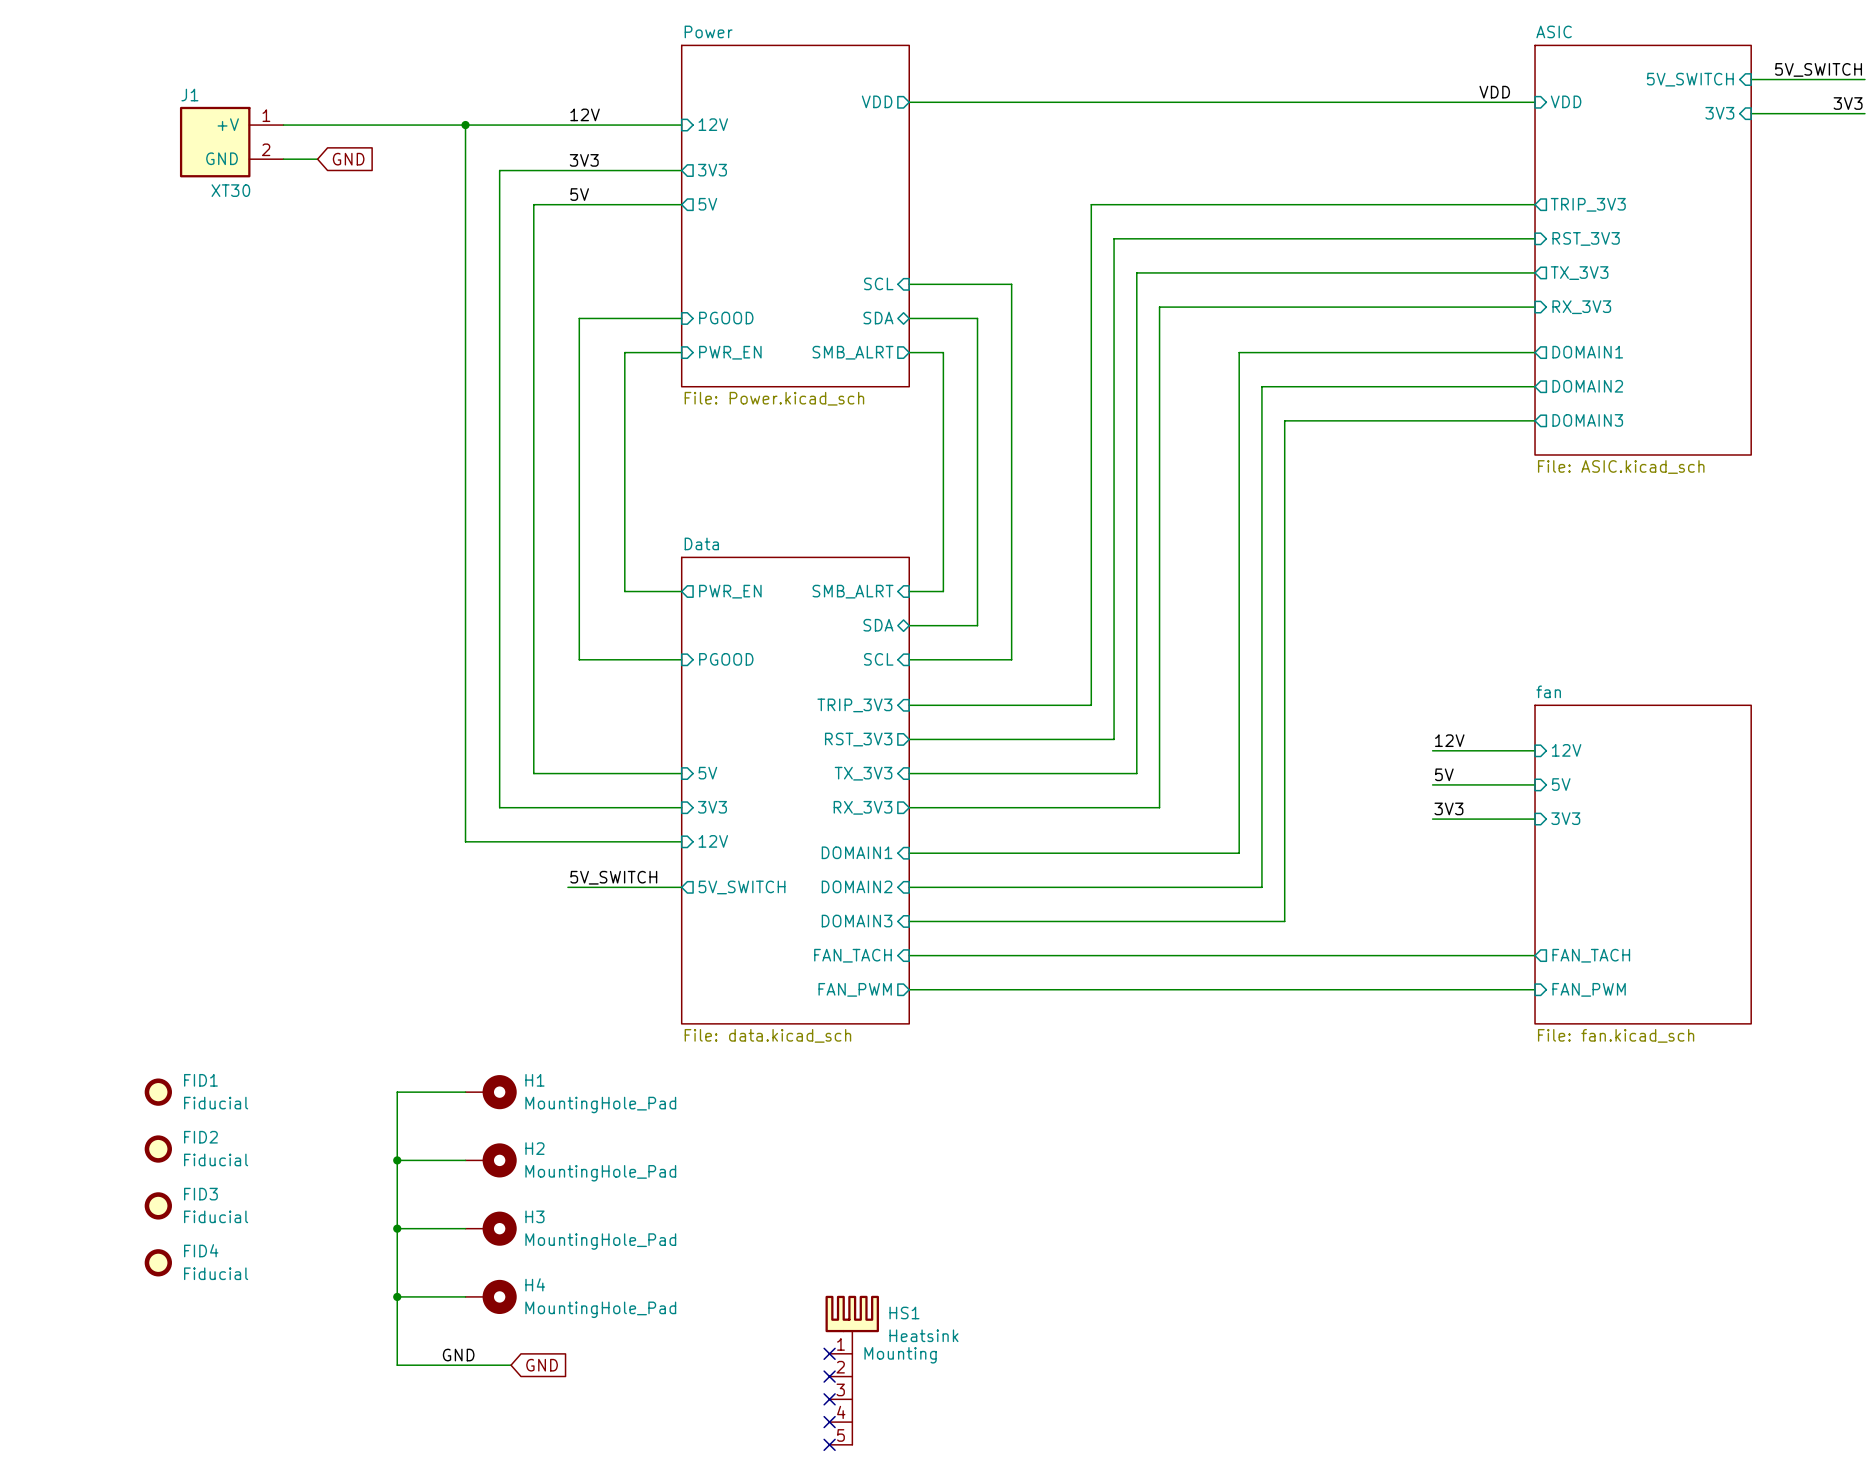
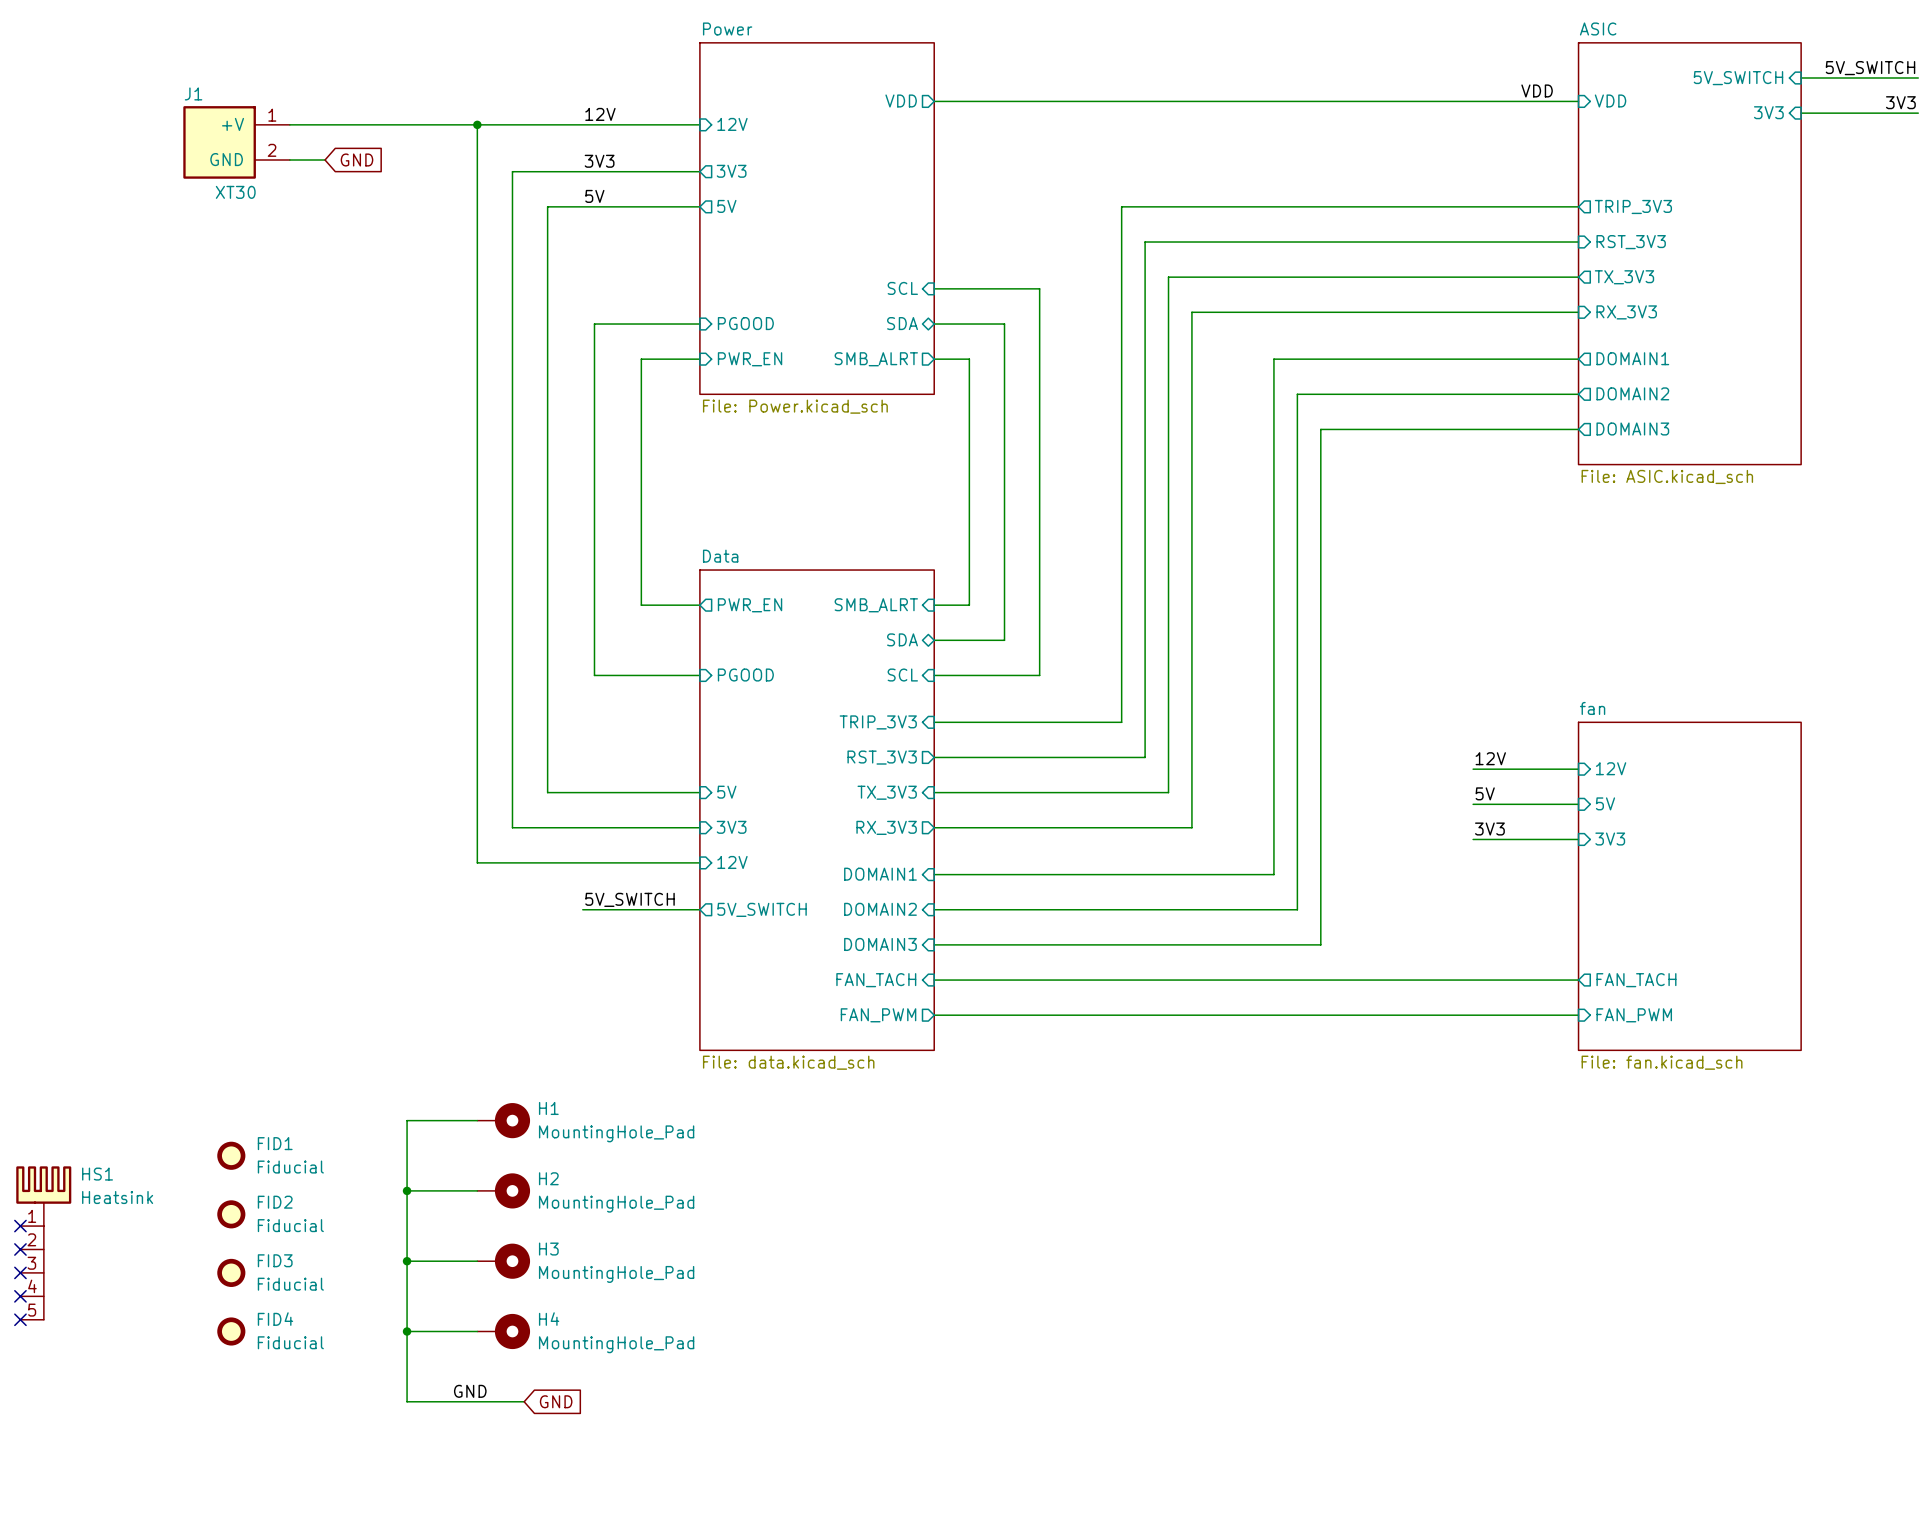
FID1 position: (158, 1092) -> (231, 1155)
FID2 position: (158, 1149) -> (231, 1214)
no-connect mark: none -> (20, 1226)
FID3 position: (158, 1205) -> (231, 1272)
no-connect mark: none -> (20, 1249)
no-connect mark: none -> (20, 1272)
no-connect mark: none -> (20, 1296)
FID4 position: (158, 1262) -> (231, 1331)
no-connect mark: none -> (20, 1319)
HS1 name position: HS1 (904, 1313) -> HS1 (97, 1174)
HS1 value position: Heatsink (923, 1335) -> Heatsink (117, 1197)
no-connect mark: (829, 1353) -> none
HS1 pin name: Mounting (900, 1355) -> none
HS1 position: (852, 1370) -> (43, 1243)
no-connect mark: (829, 1376) -> none
no-connect mark: (829, 1399) -> none
no-connect mark: (829, 1422) -> none
no-connect mark: (829, 1444) -> none

